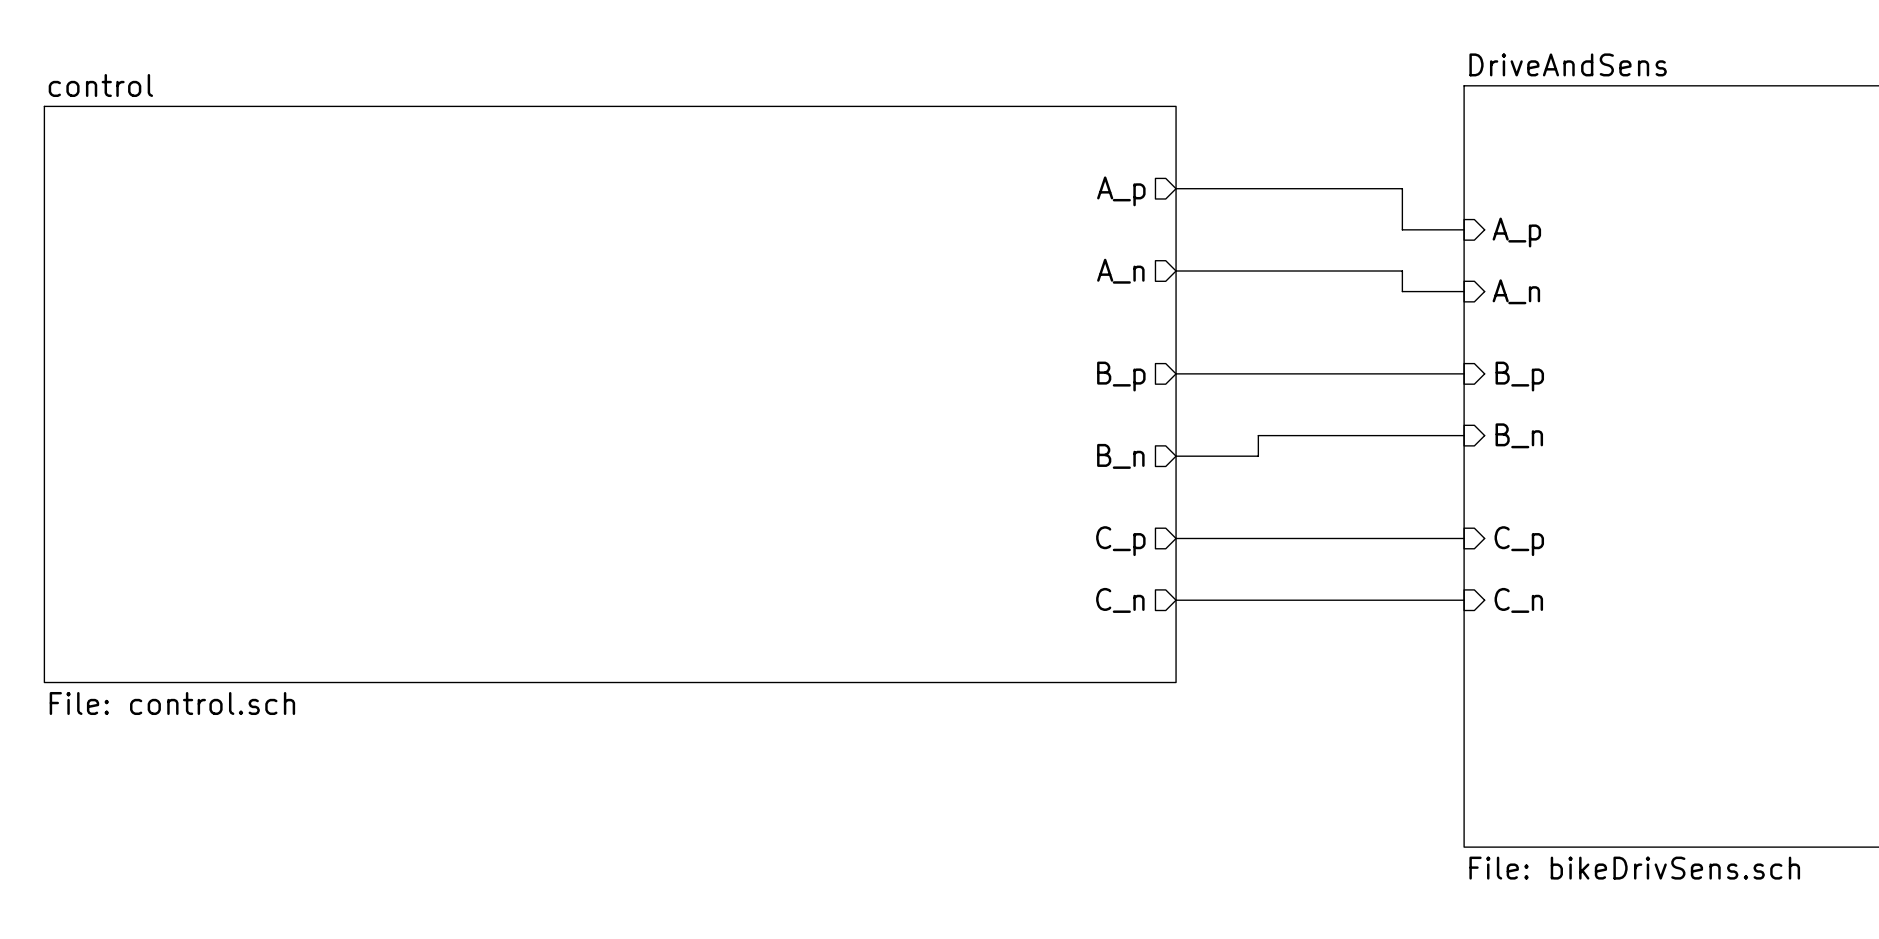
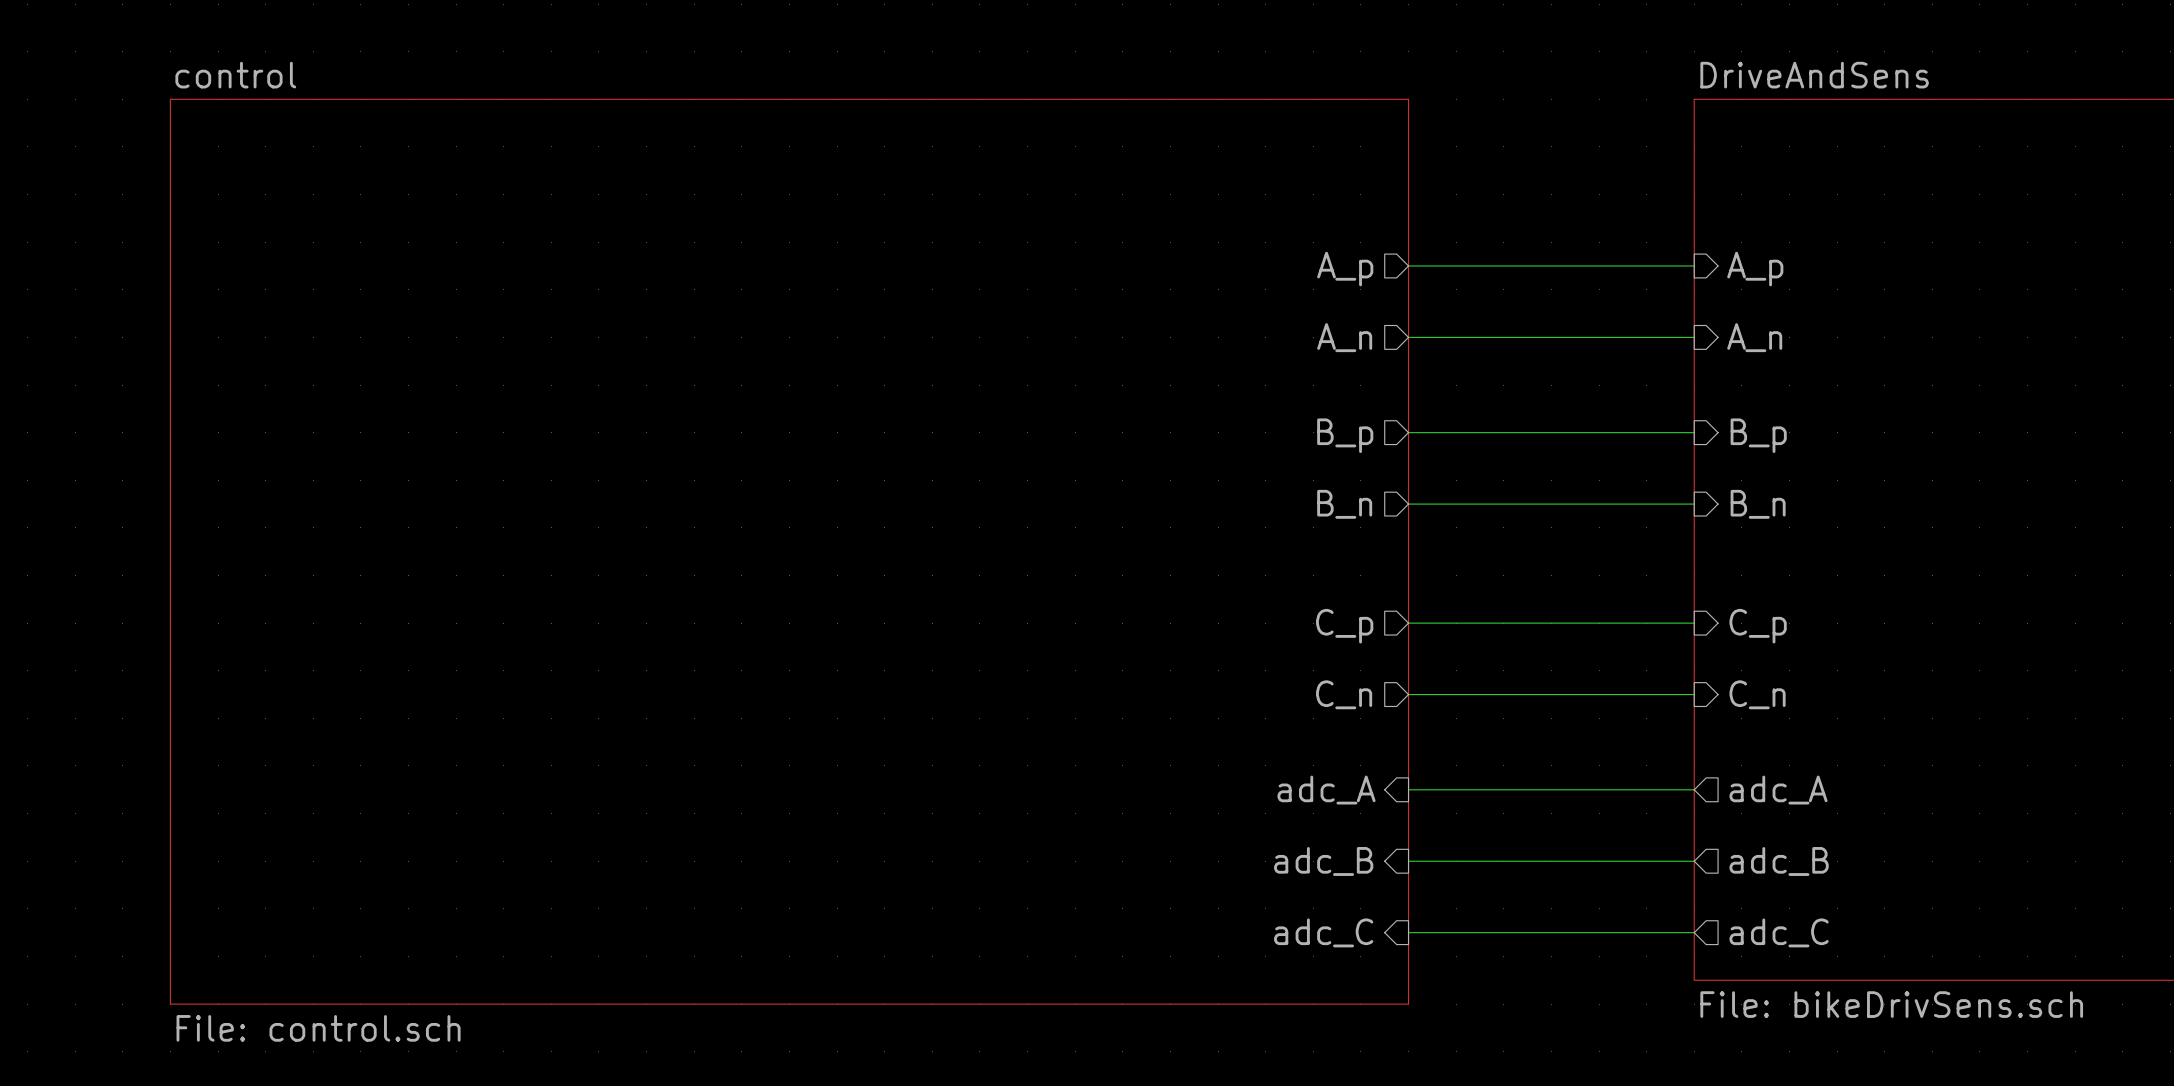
wire: (1176, 188) (1402, 188) (1402, 229) -> (1408, 265) (1622, 265)
sheet pin position: A_p (1121, 191) -> A_p (1345, 269)
sheet pin position: A_n (1120, 271) -> A_n (1344, 337)
wire: (1176, 271) (1402, 271) (1402, 291) -> (1408, 337) (1622, 337)
wire: (1176, 373) (1217, 373) -> none
sheet pin position: B_p (1121, 376) -> B_p (1345, 435)
sheet control: File: control.sch (610, 394) -> none
wire: (1258, 435) (1258, 456) (1176, 456) -> (1456, 504) (1408, 504)
sheet pin position: B_n (1120, 456) -> B_n (1344, 504)
sheet control: none -> File: control.sch (789, 551)
wire: (1176, 538) (1217, 538) -> none
sheet pin position: C_p (1120, 541) -> C_p (1344, 626)
sheet pin position: C_n (1120, 600) -> C_n (1344, 694)
wire: (1176, 600) (1217, 600) -> none
sheet pin: none -> adc_A (1326, 790)
wire: none -> (1408, 789) (1694, 789)
sheet pin: none -> adc_A (1778, 790)
sheet pin: none -> adc_B (1323, 861)
wire: none -> (1408, 861) (1694, 861)
sheet pin: none -> adc_B (1779, 861)
wire: none -> (1408, 932) (1694, 932)
sheet pin: none -> adc_C (1323, 932)
sheet pin: none -> adc_C (1779, 932)

